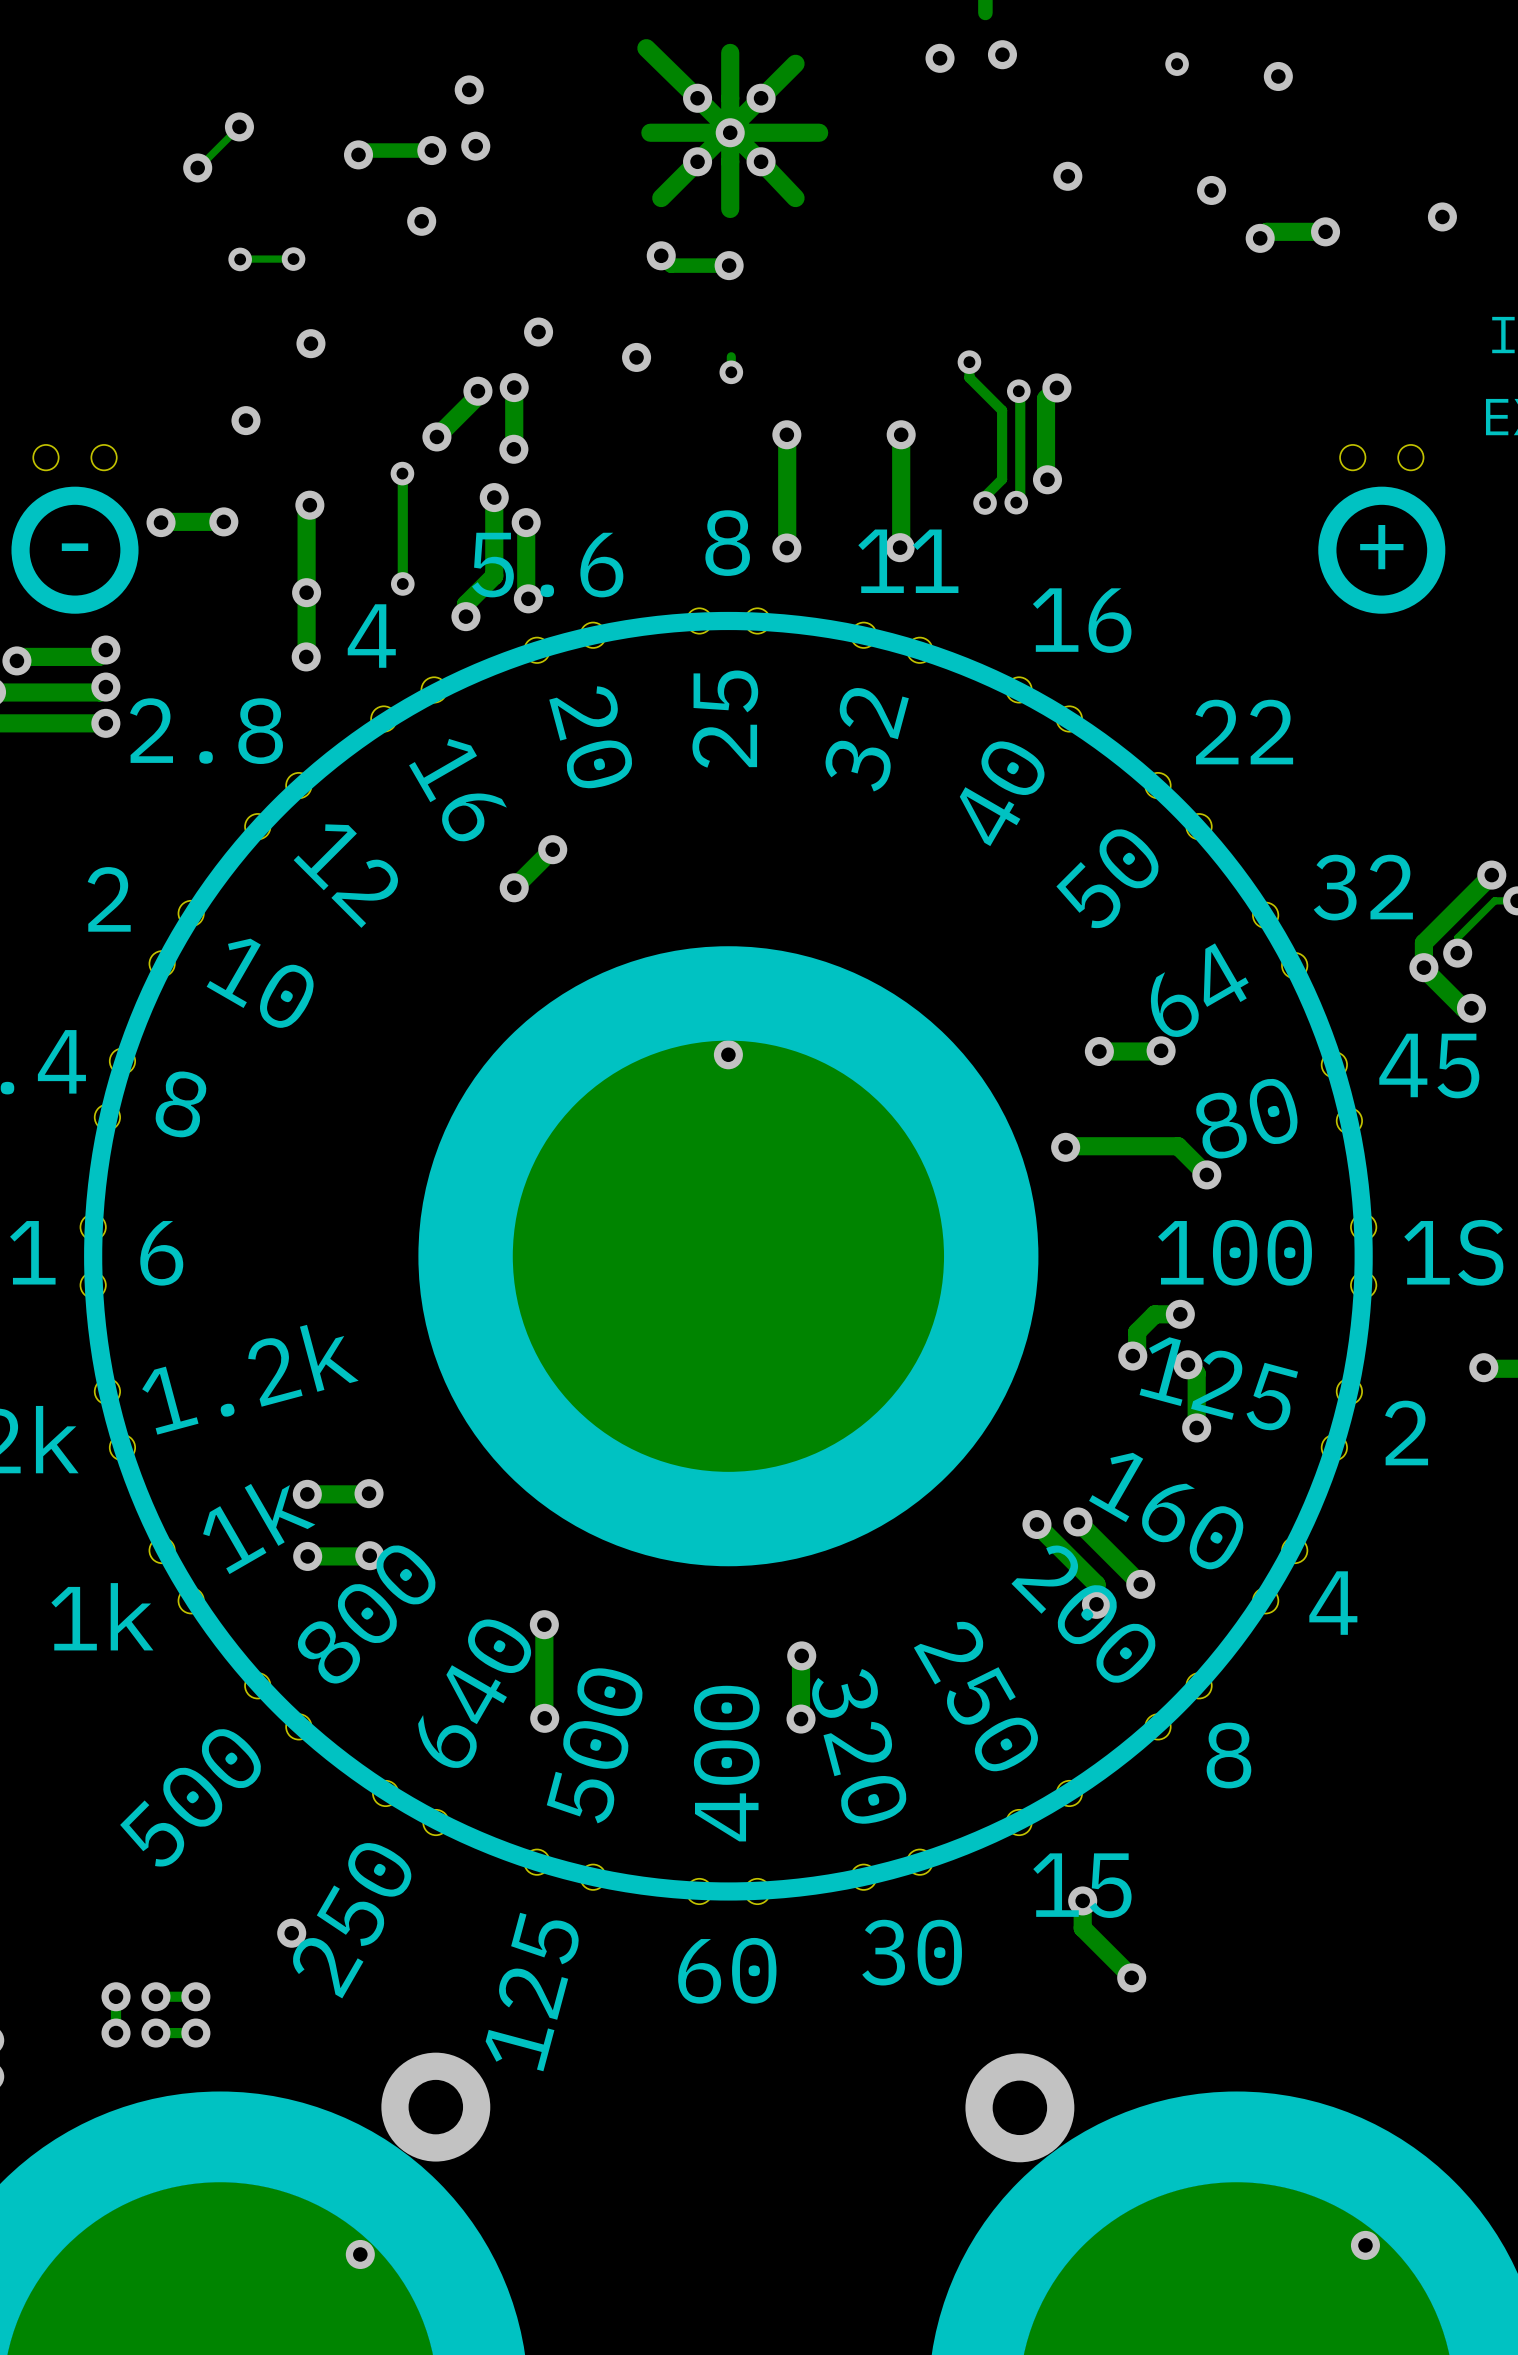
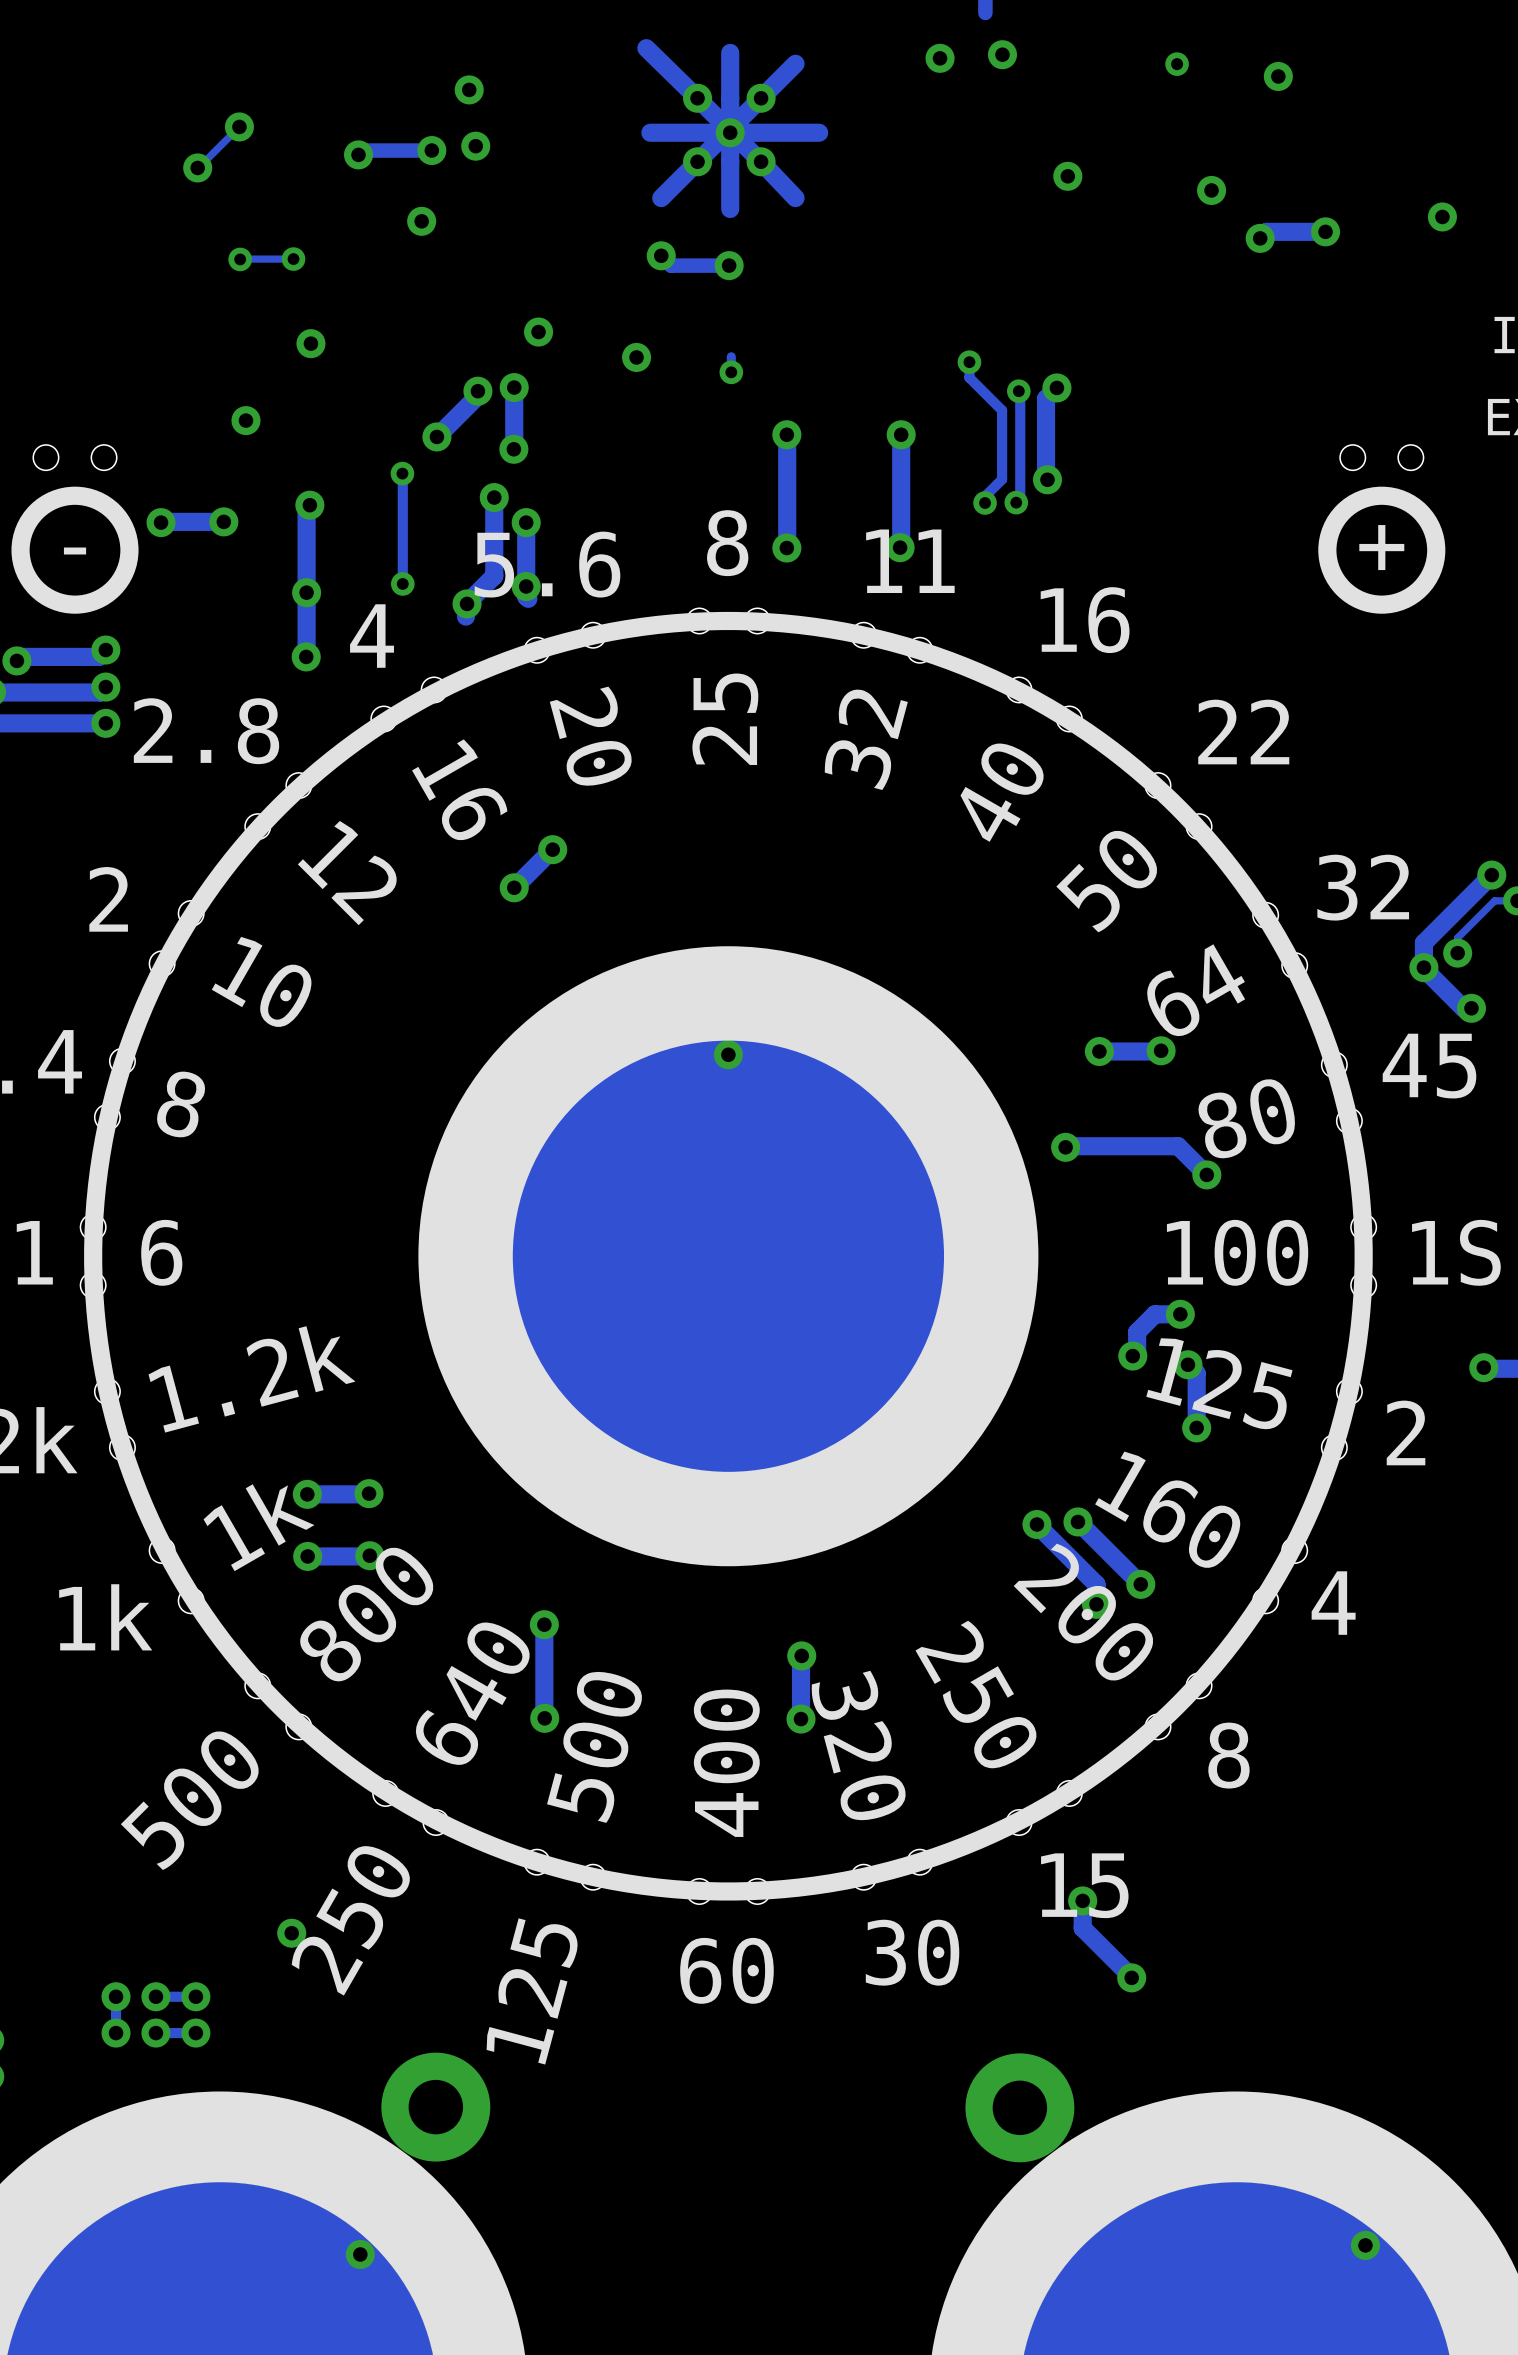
via position: (528, 598) -> (526, 586)
via position: (465, 616) -> (467, 603)

